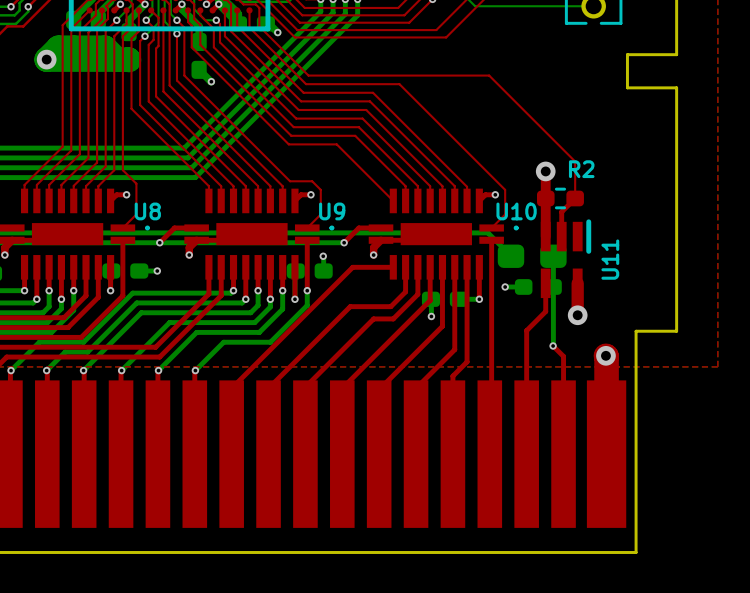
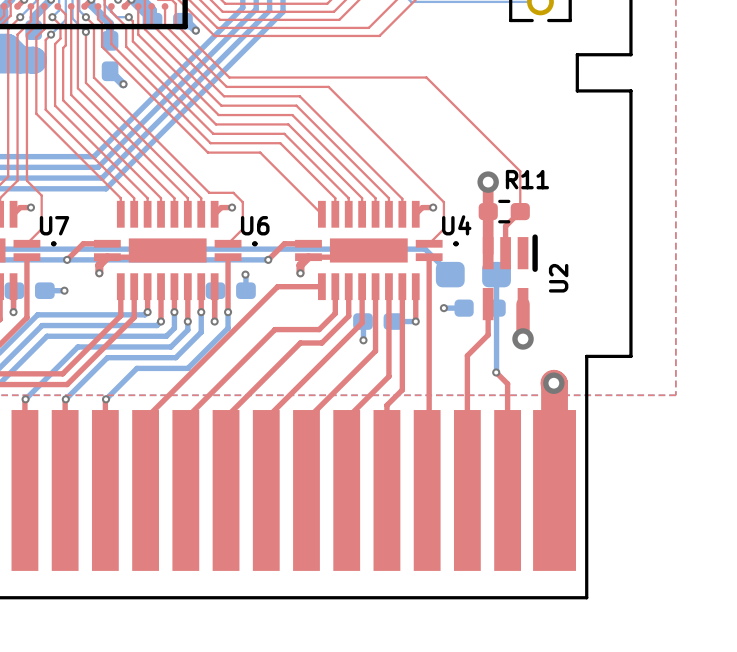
R2 name: R2 (581, 169) -> R11 (527, 179)
U8 name: U8 (147, 211) -> U7 (54, 225)
U9 name: U9 (332, 211) -> U6 (255, 225)
U10 name: U10 (516, 211) -> U4 (456, 225)
U11 name: U11 (610, 259) -> U2 (558, 278)

